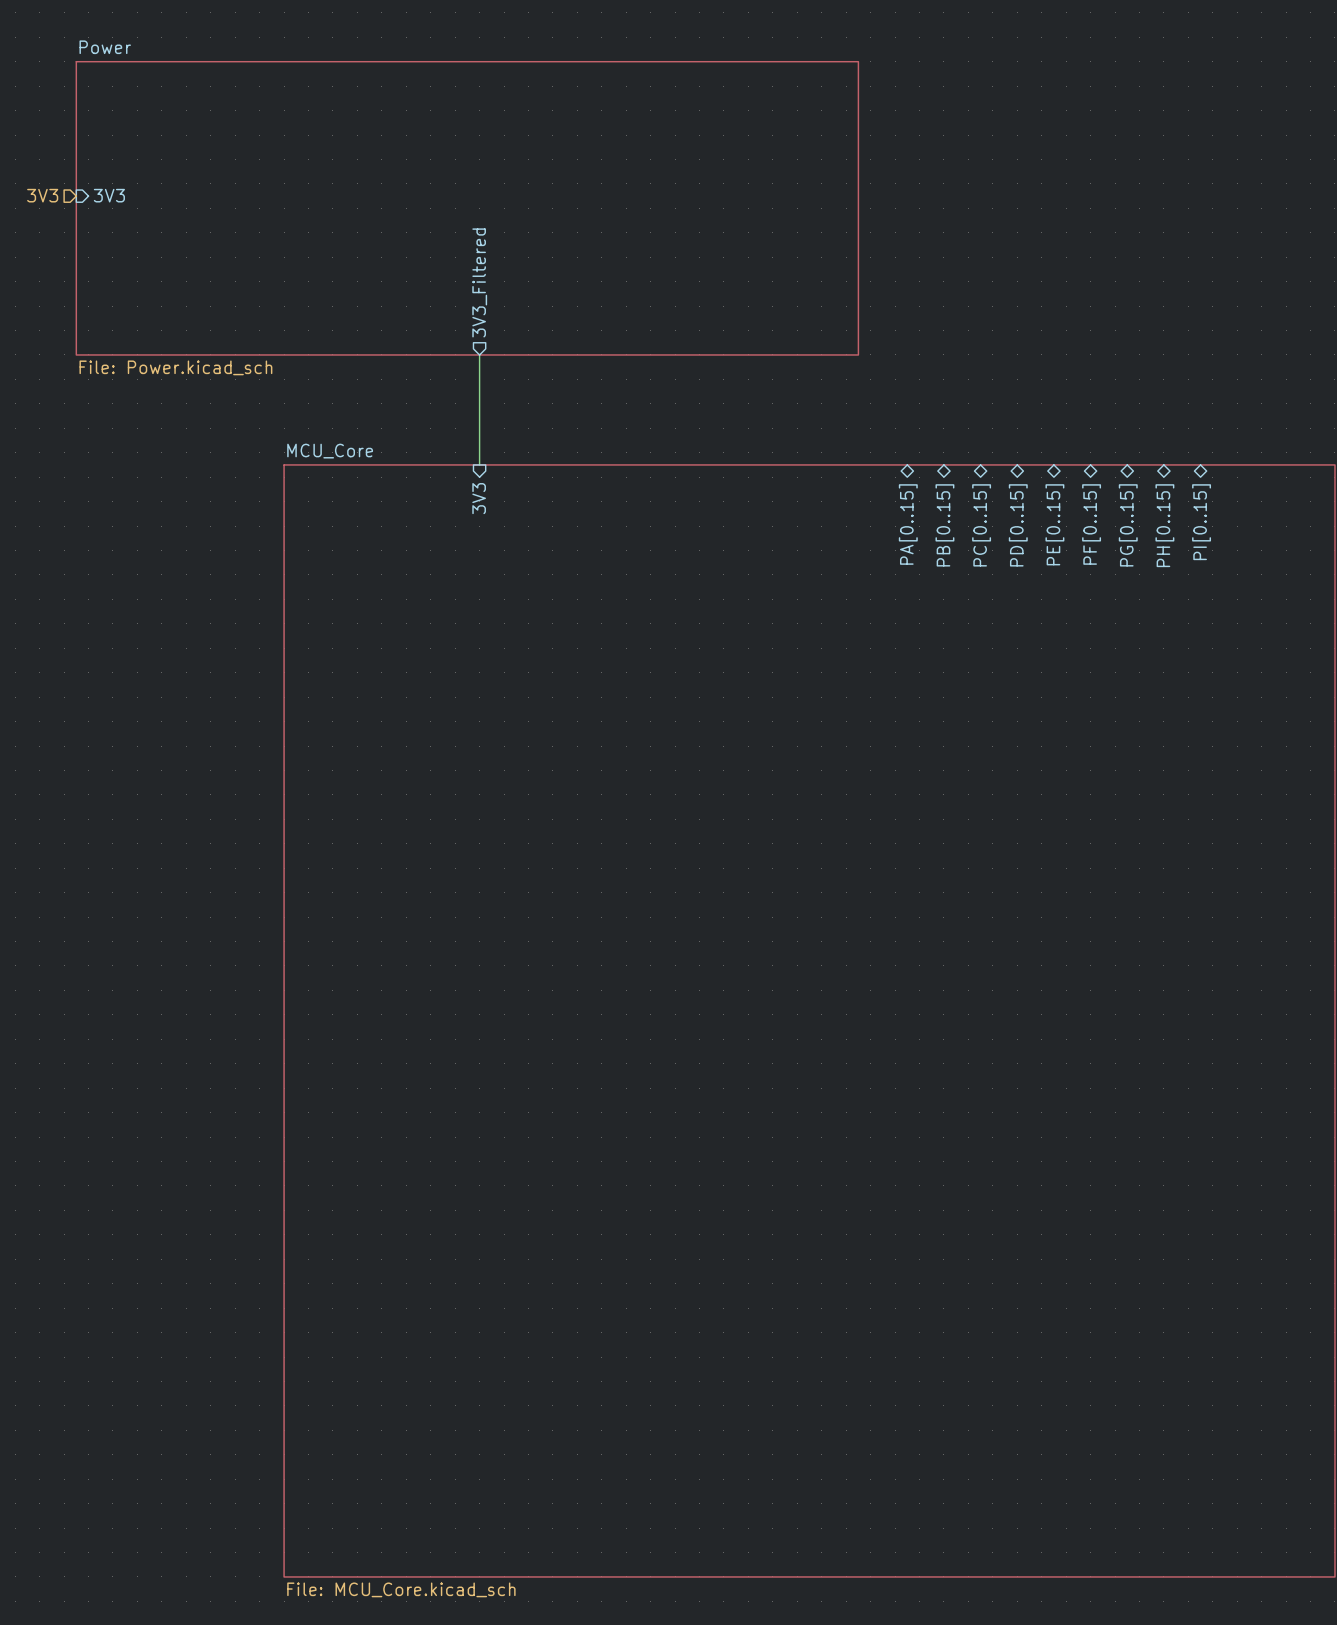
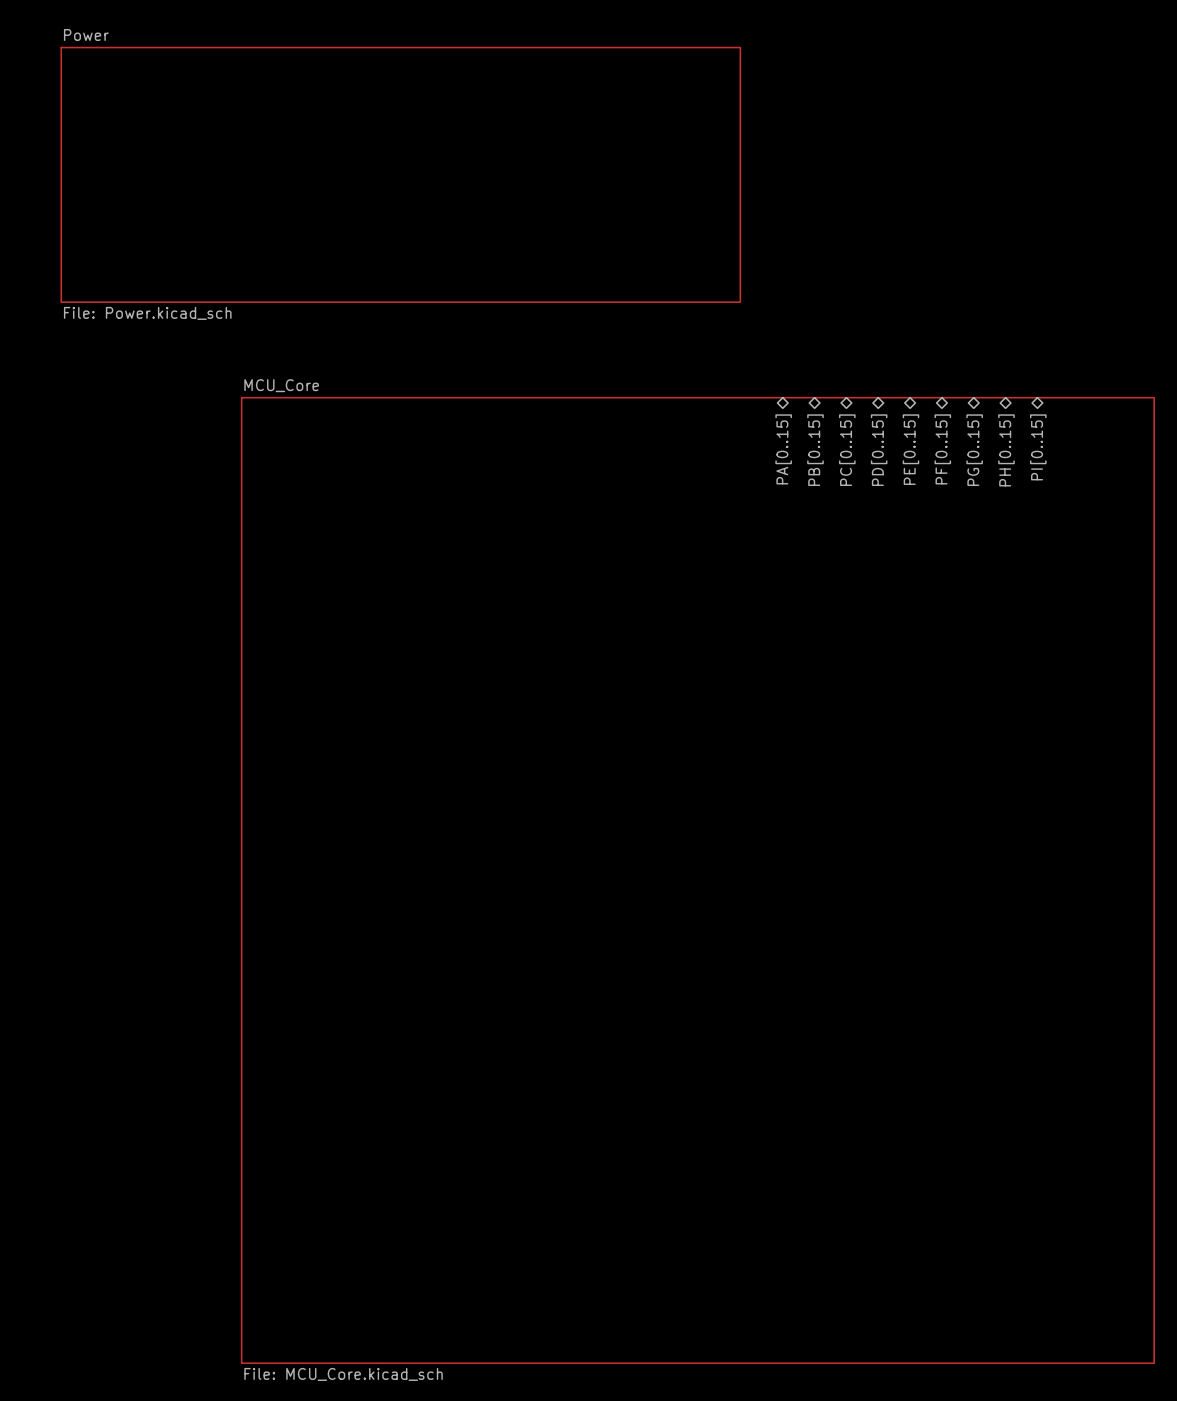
hierarchical label: 3V3 (42, 195) -> none
sheet pin: 3V3 (109, 195) -> none
sheet pin: 3V3_Filtered (479, 282) -> none
wire: (479, 354) (479, 464) -> none
sheet pin: 3V3 (479, 498) -> none

